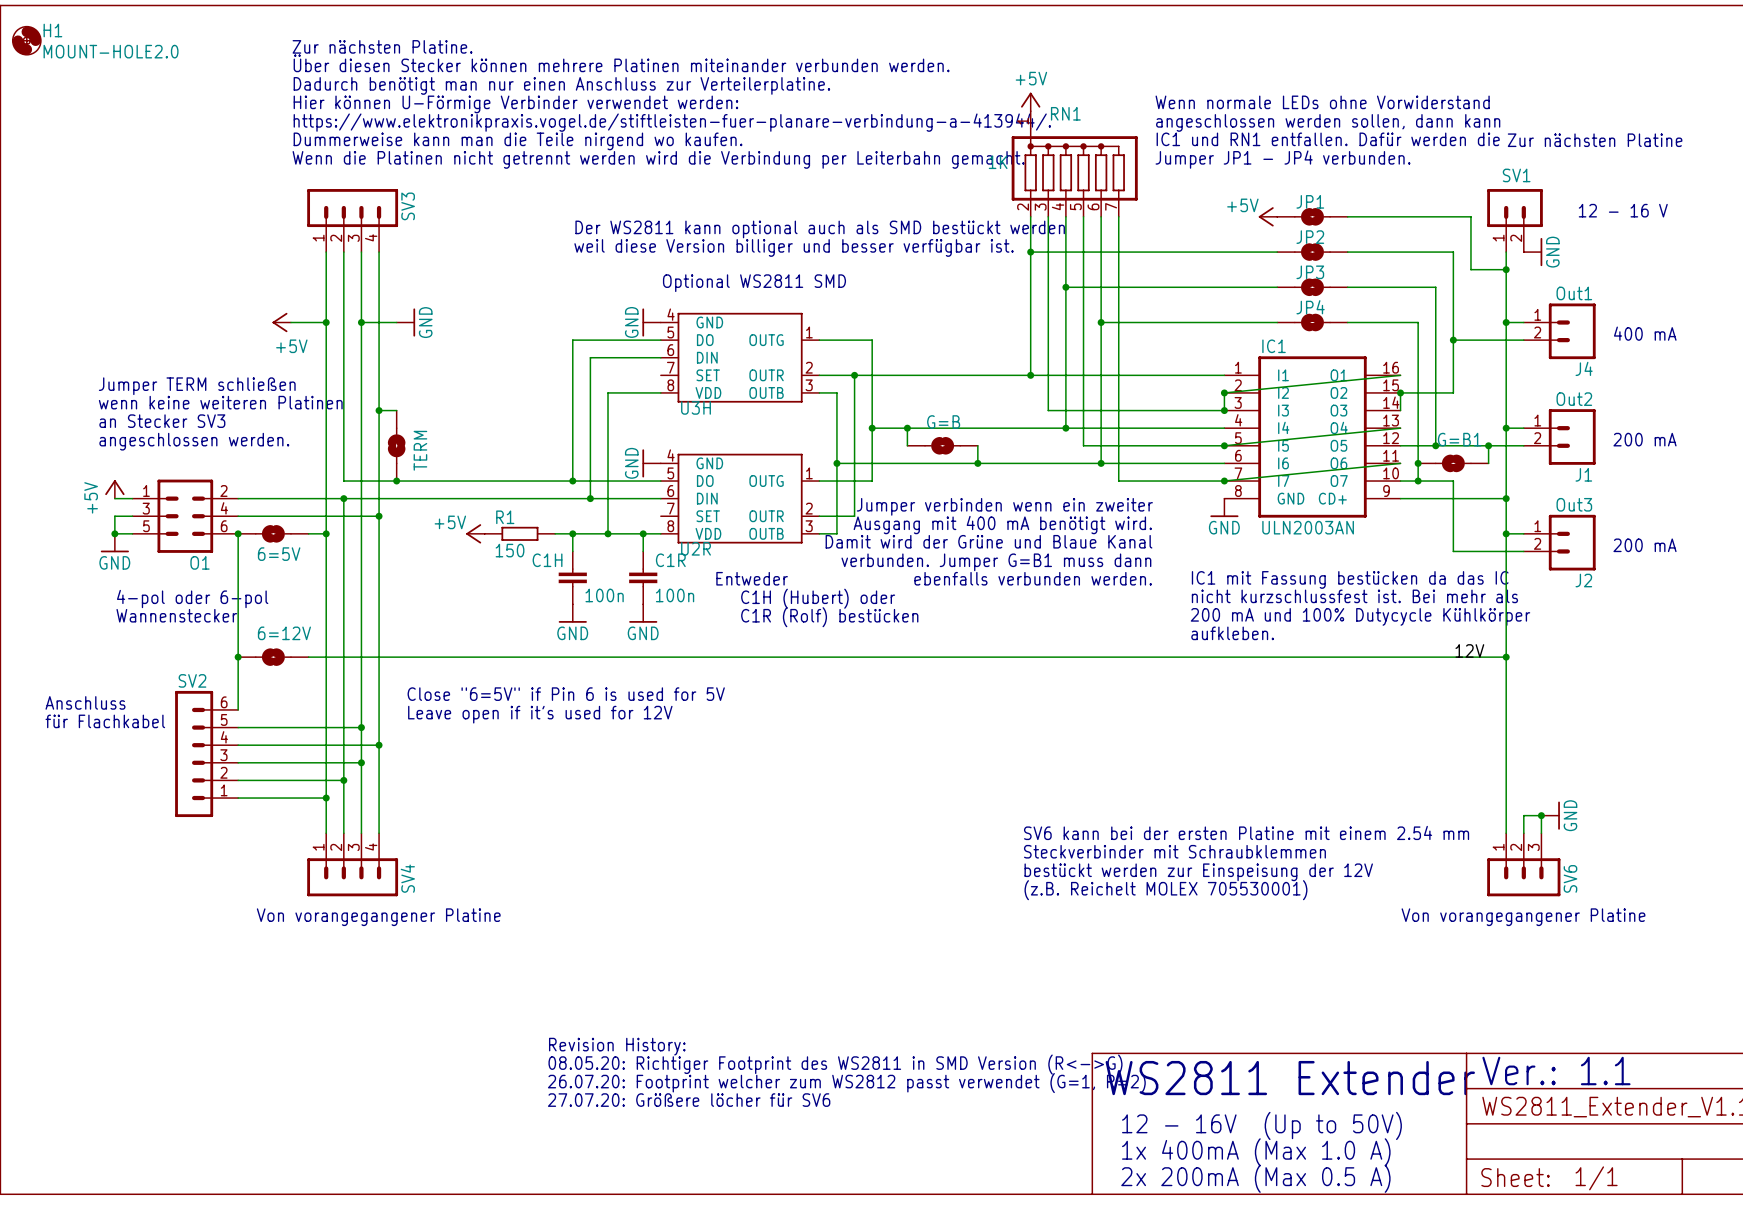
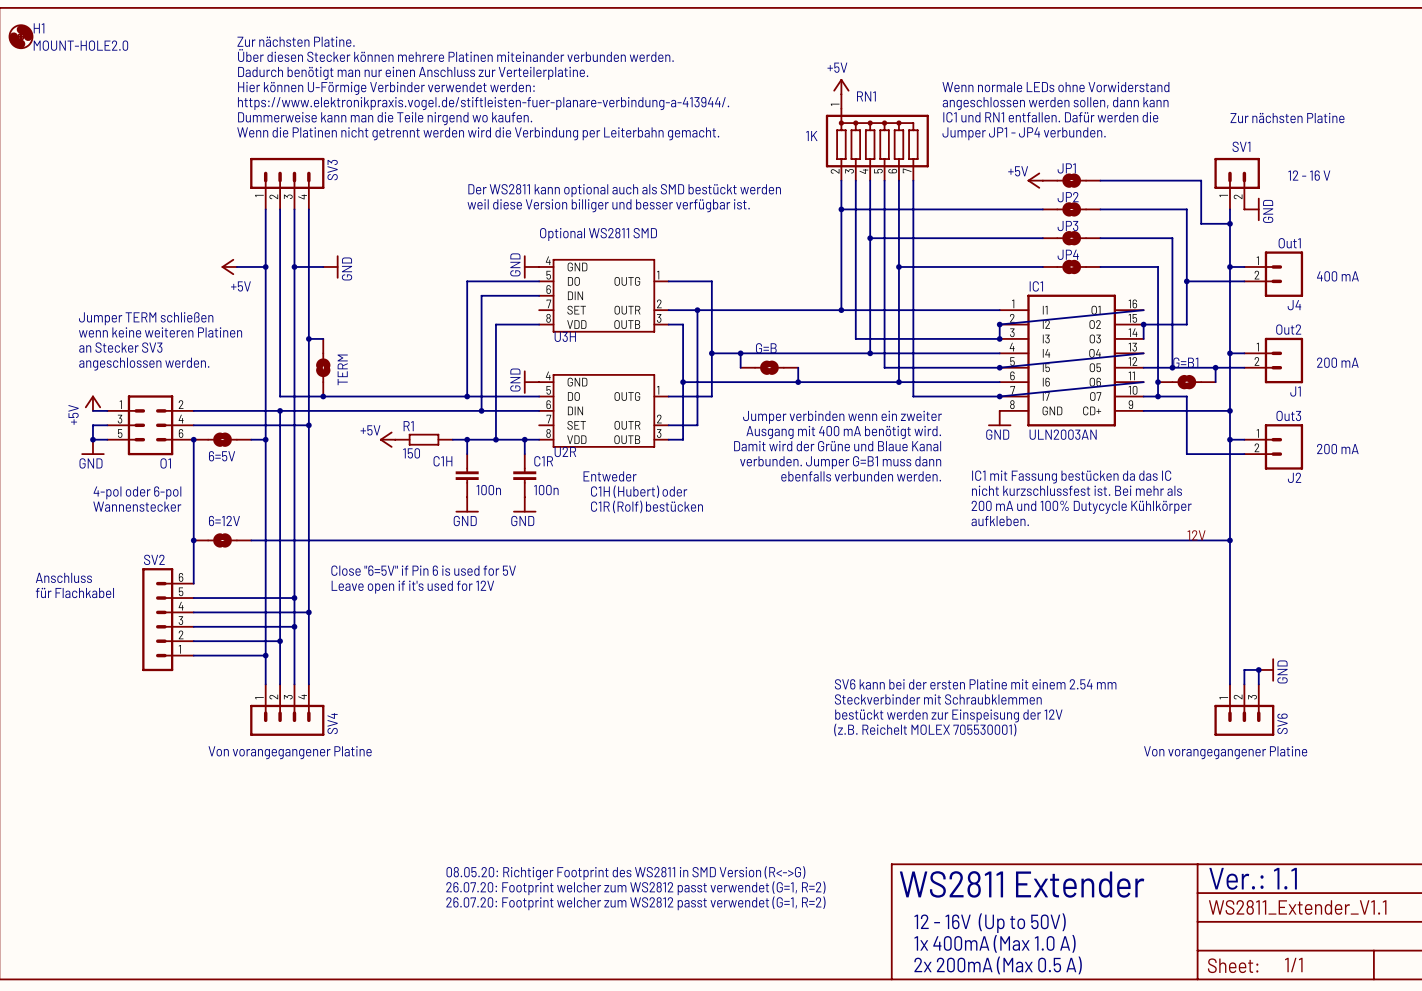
text: Revision History: (617, 1046) -> none
text: 27.07.20: Größere löcher für SV6 (689, 1100) -> 26.07.20: Footprint welcher zum WS2812 passt verwendet (G=1, R=2) (635, 903)

